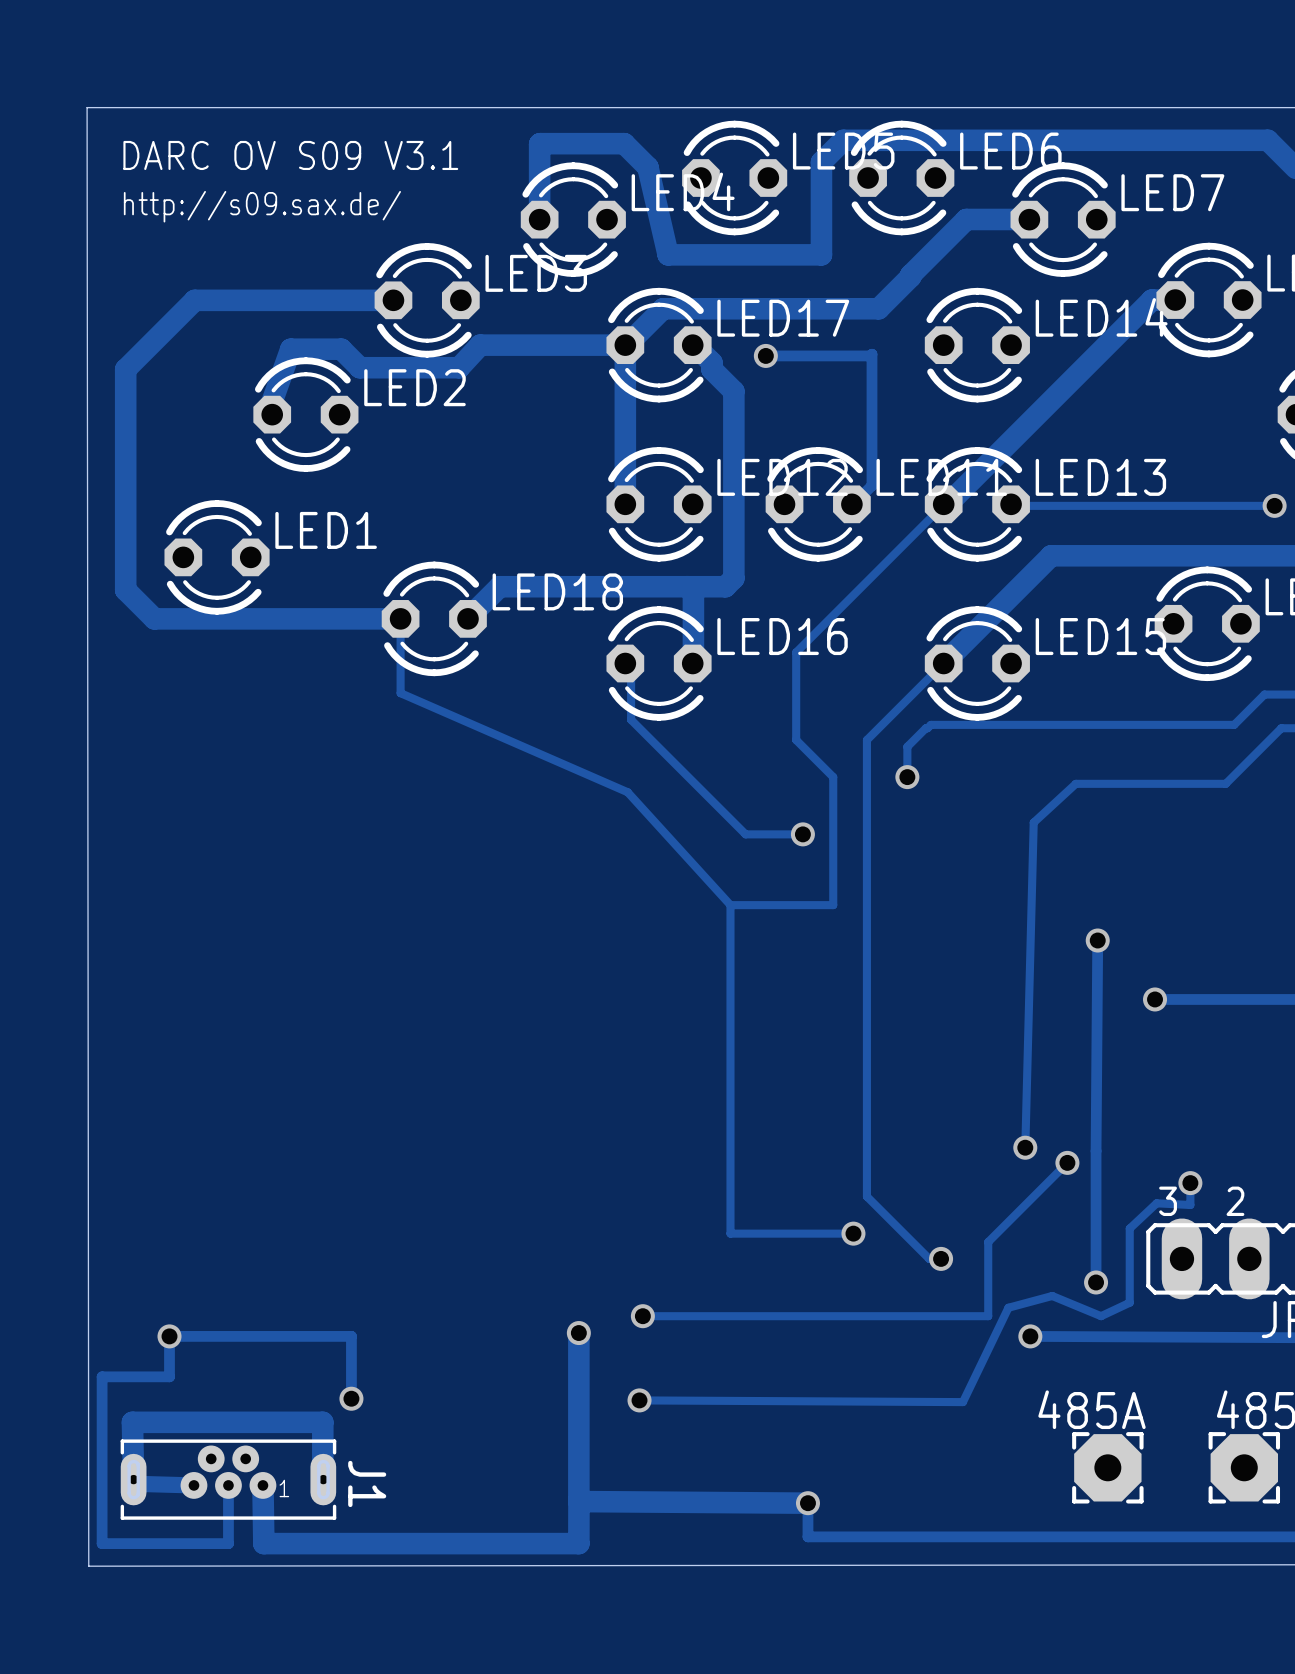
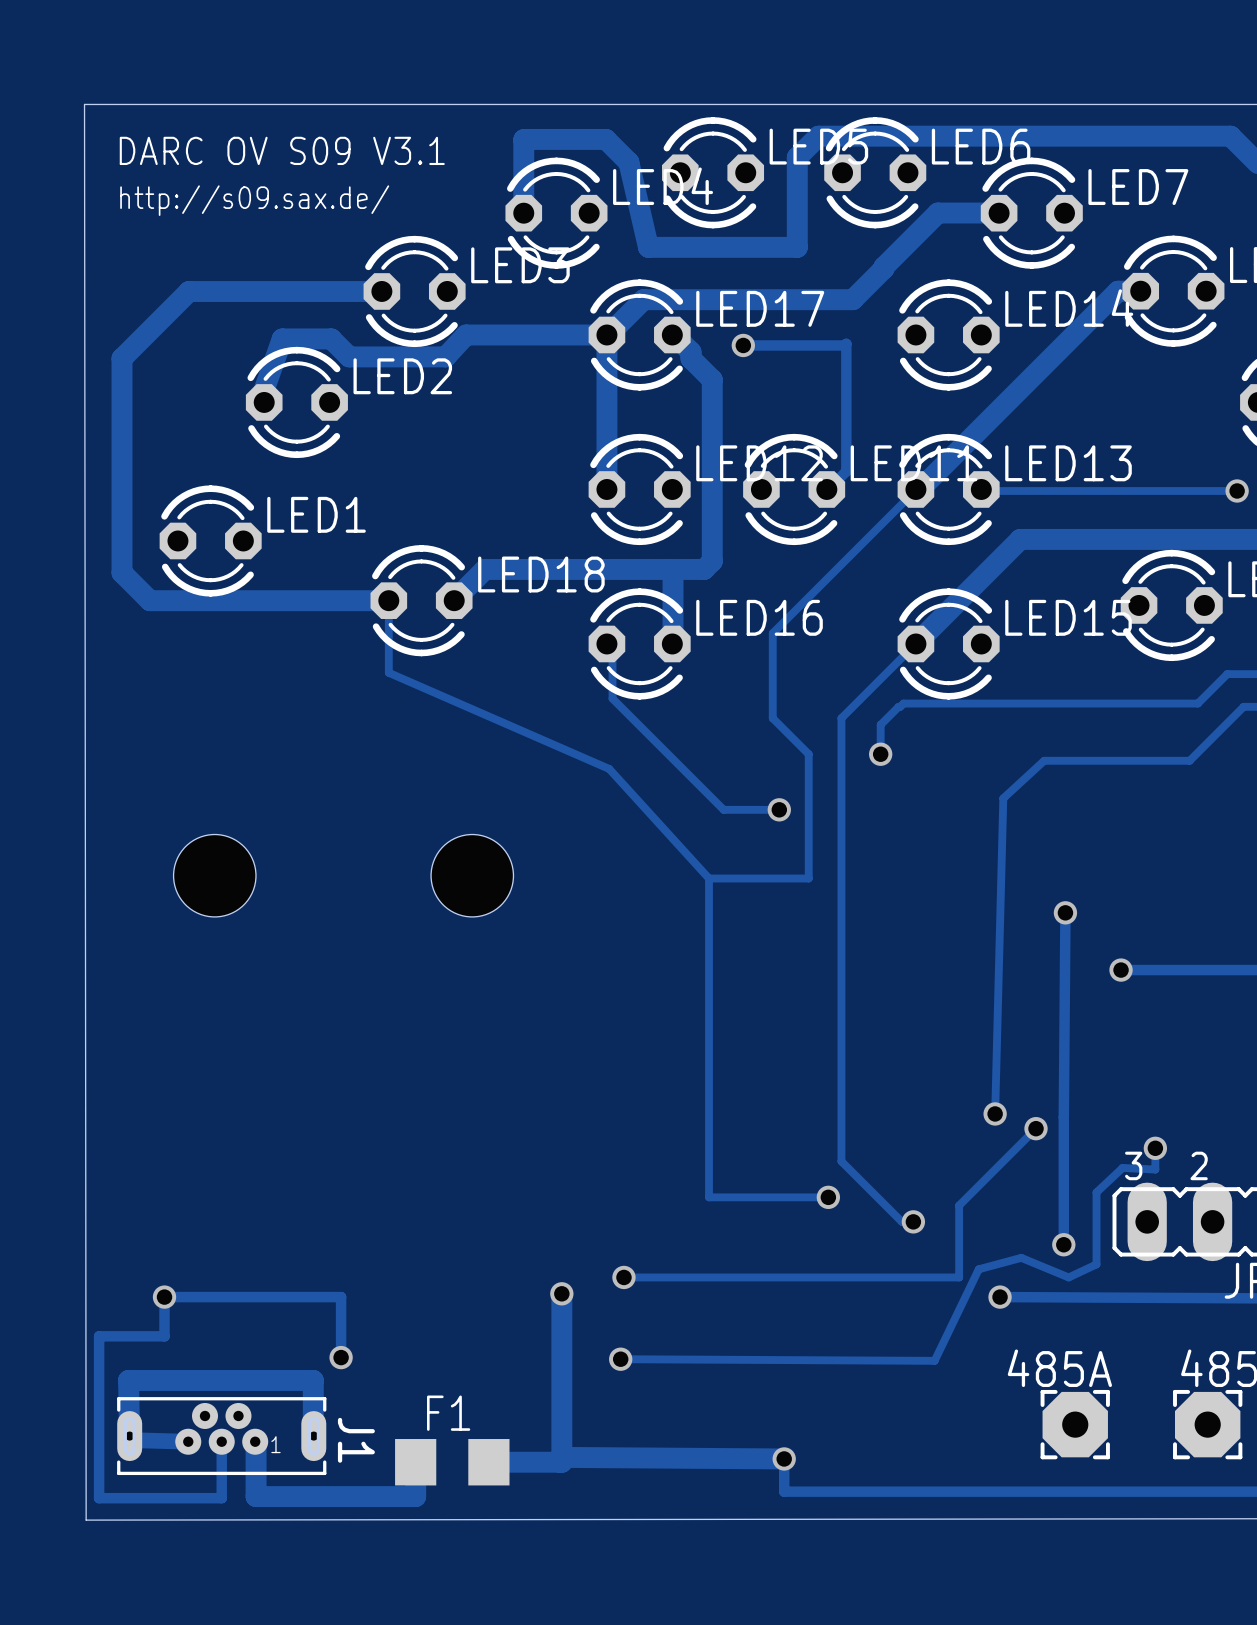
hole: none -> (214, 875)
hole: none -> (472, 875)
track: (262, 1485) (263, 1543) (578, 1543) (578, 1501) -> (255, 1441) (256, 1496) (415, 1496) (415, 1462)
F1: none -> (452, 1462)
track: none -> (488, 1462) (561, 1462) (560, 1462)

